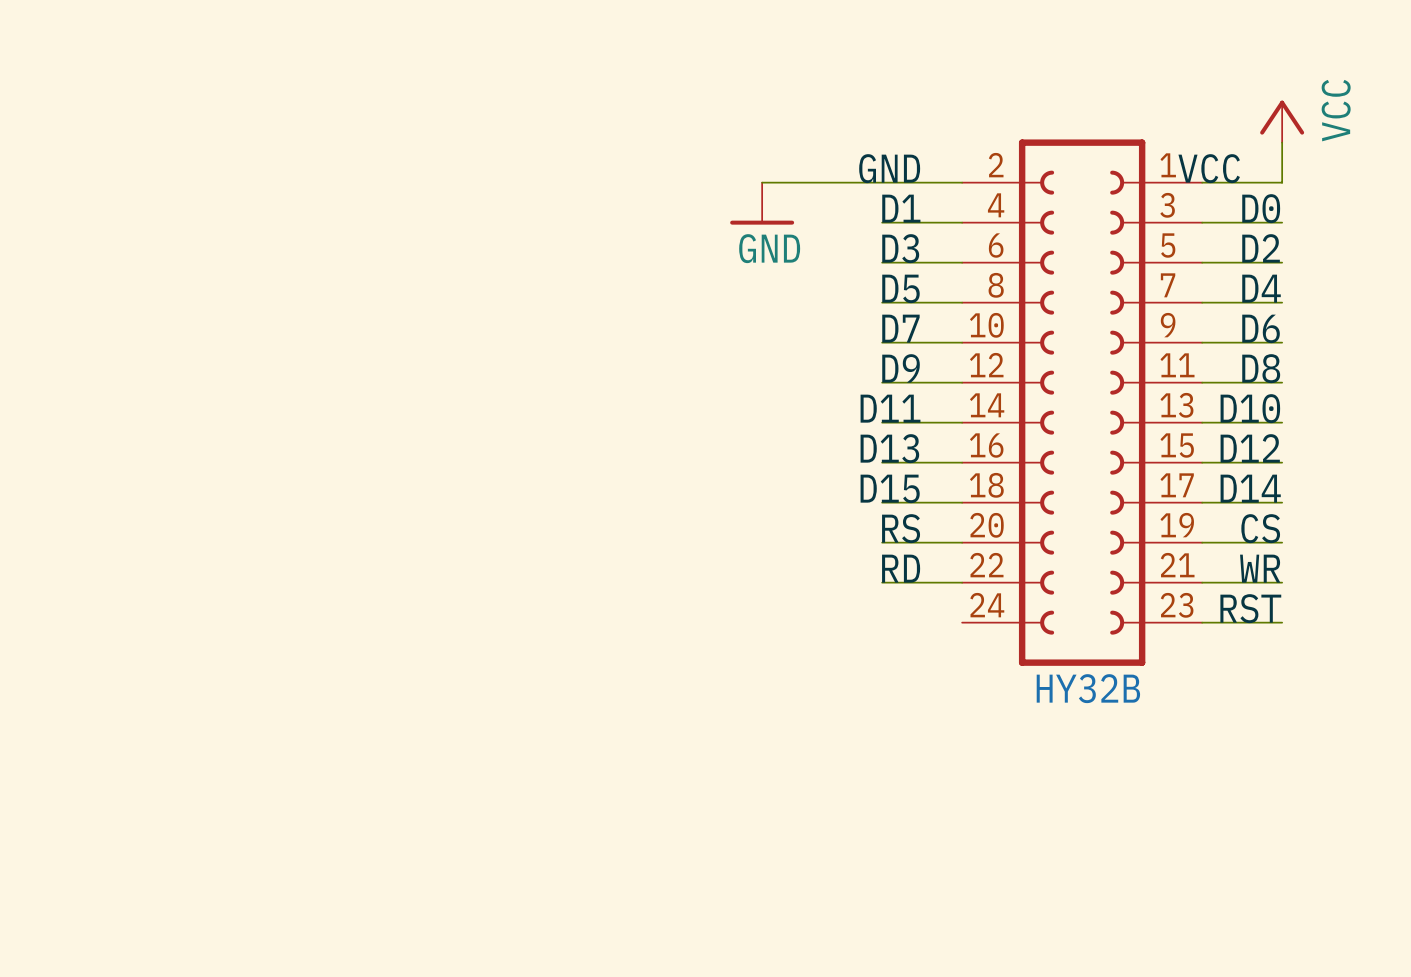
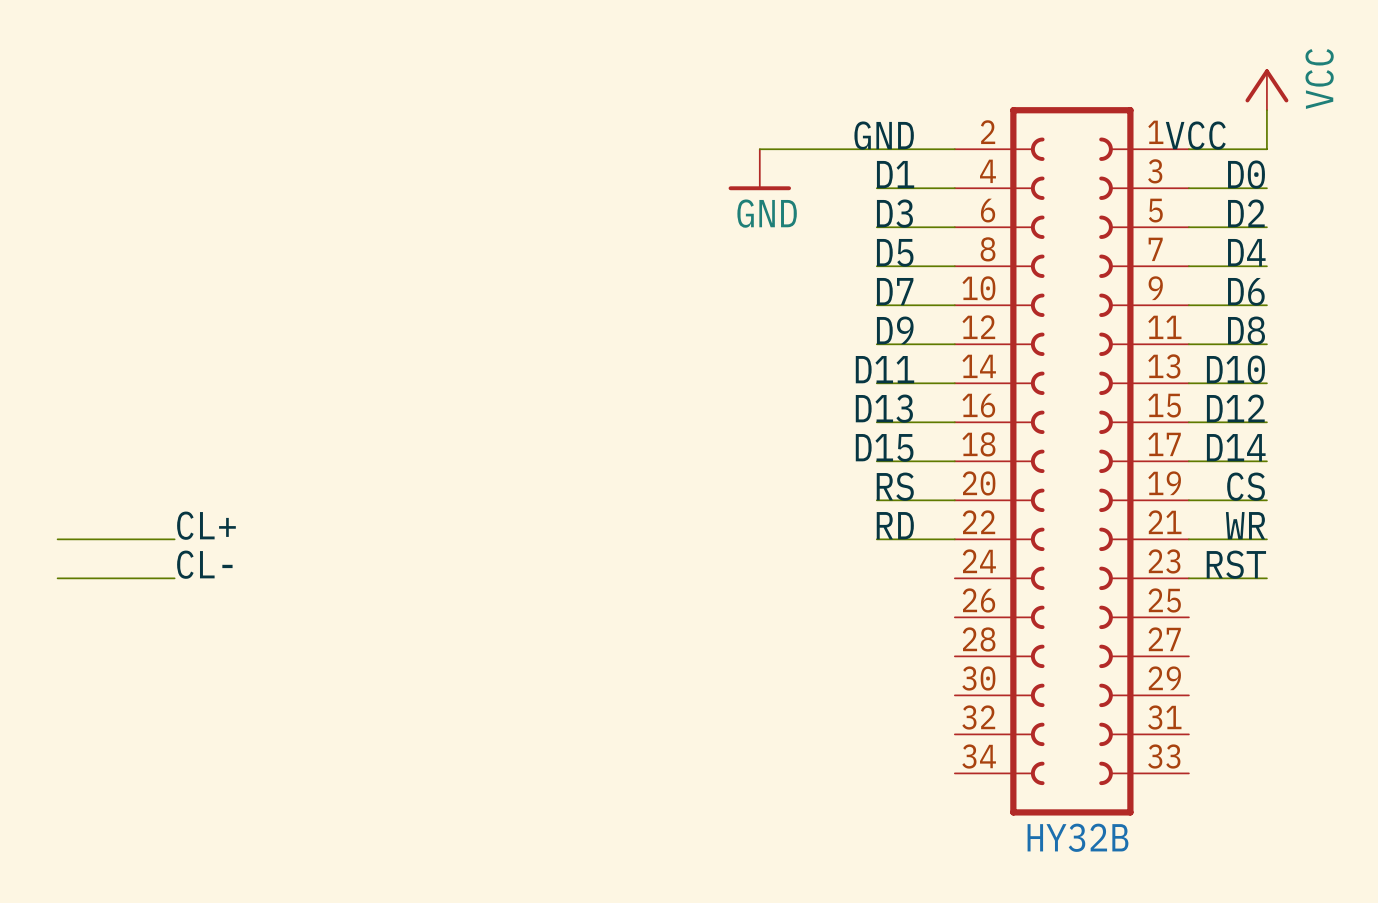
HY32B symbol: [962, 139, 1203, 666] -> [954, 107, 1189, 816]
label: none -> CL+ (206, 525)
wire: none -> (57, 539) (174, 539)
label: none -> CL- (204, 564)
wire: none -> (57, 578) (174, 578)
HY32B name position: HY32B (1088, 688) -> HY32B (1077, 837)

